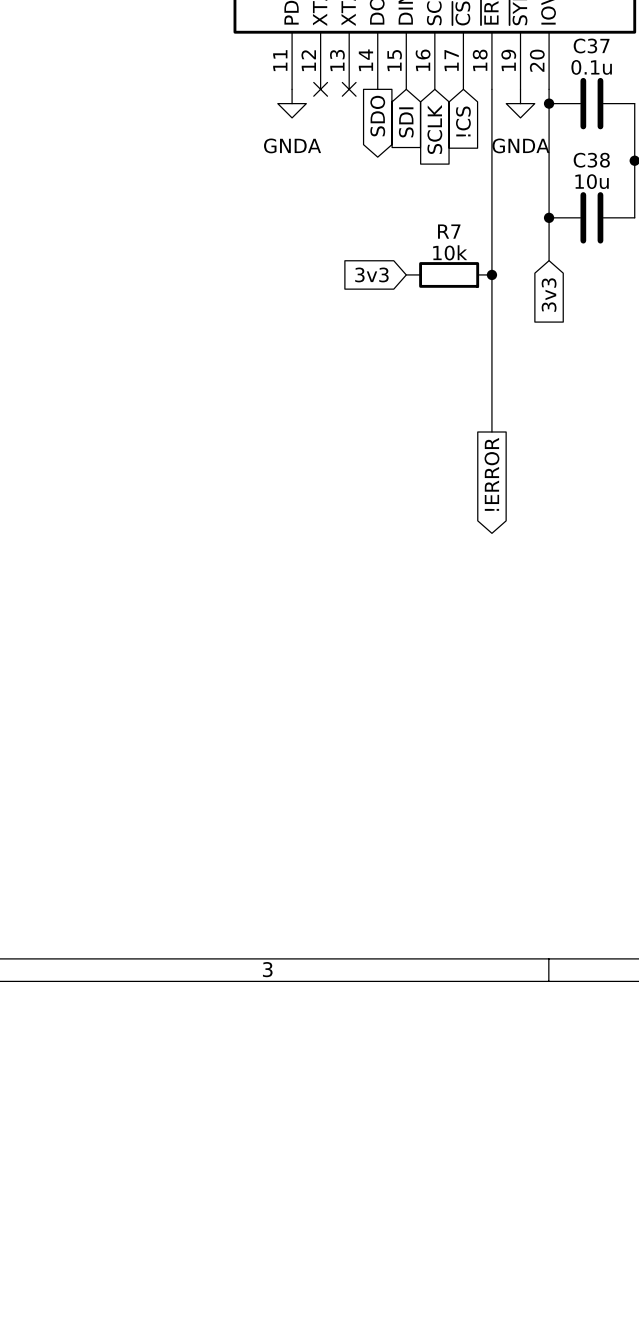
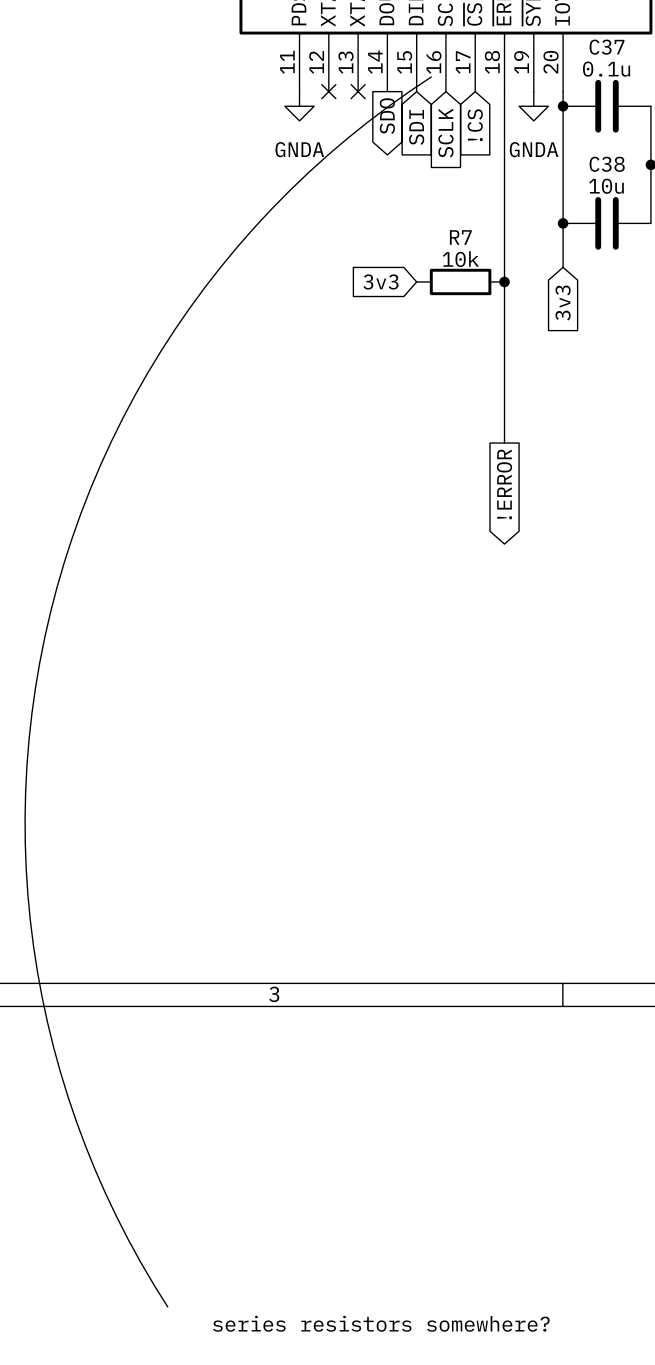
line: none -> (431, 76) (368, 121) (308, 172) (254, 227) (220, 266) (189, 308) (160, 351) (134, 395) (100, 465) (72, 537) (57, 587) (44, 637) (35, 688) (29, 739) (25, 817) (27, 894) (37, 971) (47, 1022) (60, 1072) (85, 1145) (105, 1193) (128, 1239) (167, 1306)
text: none -> series resistors somewhere? (381, 1323)

